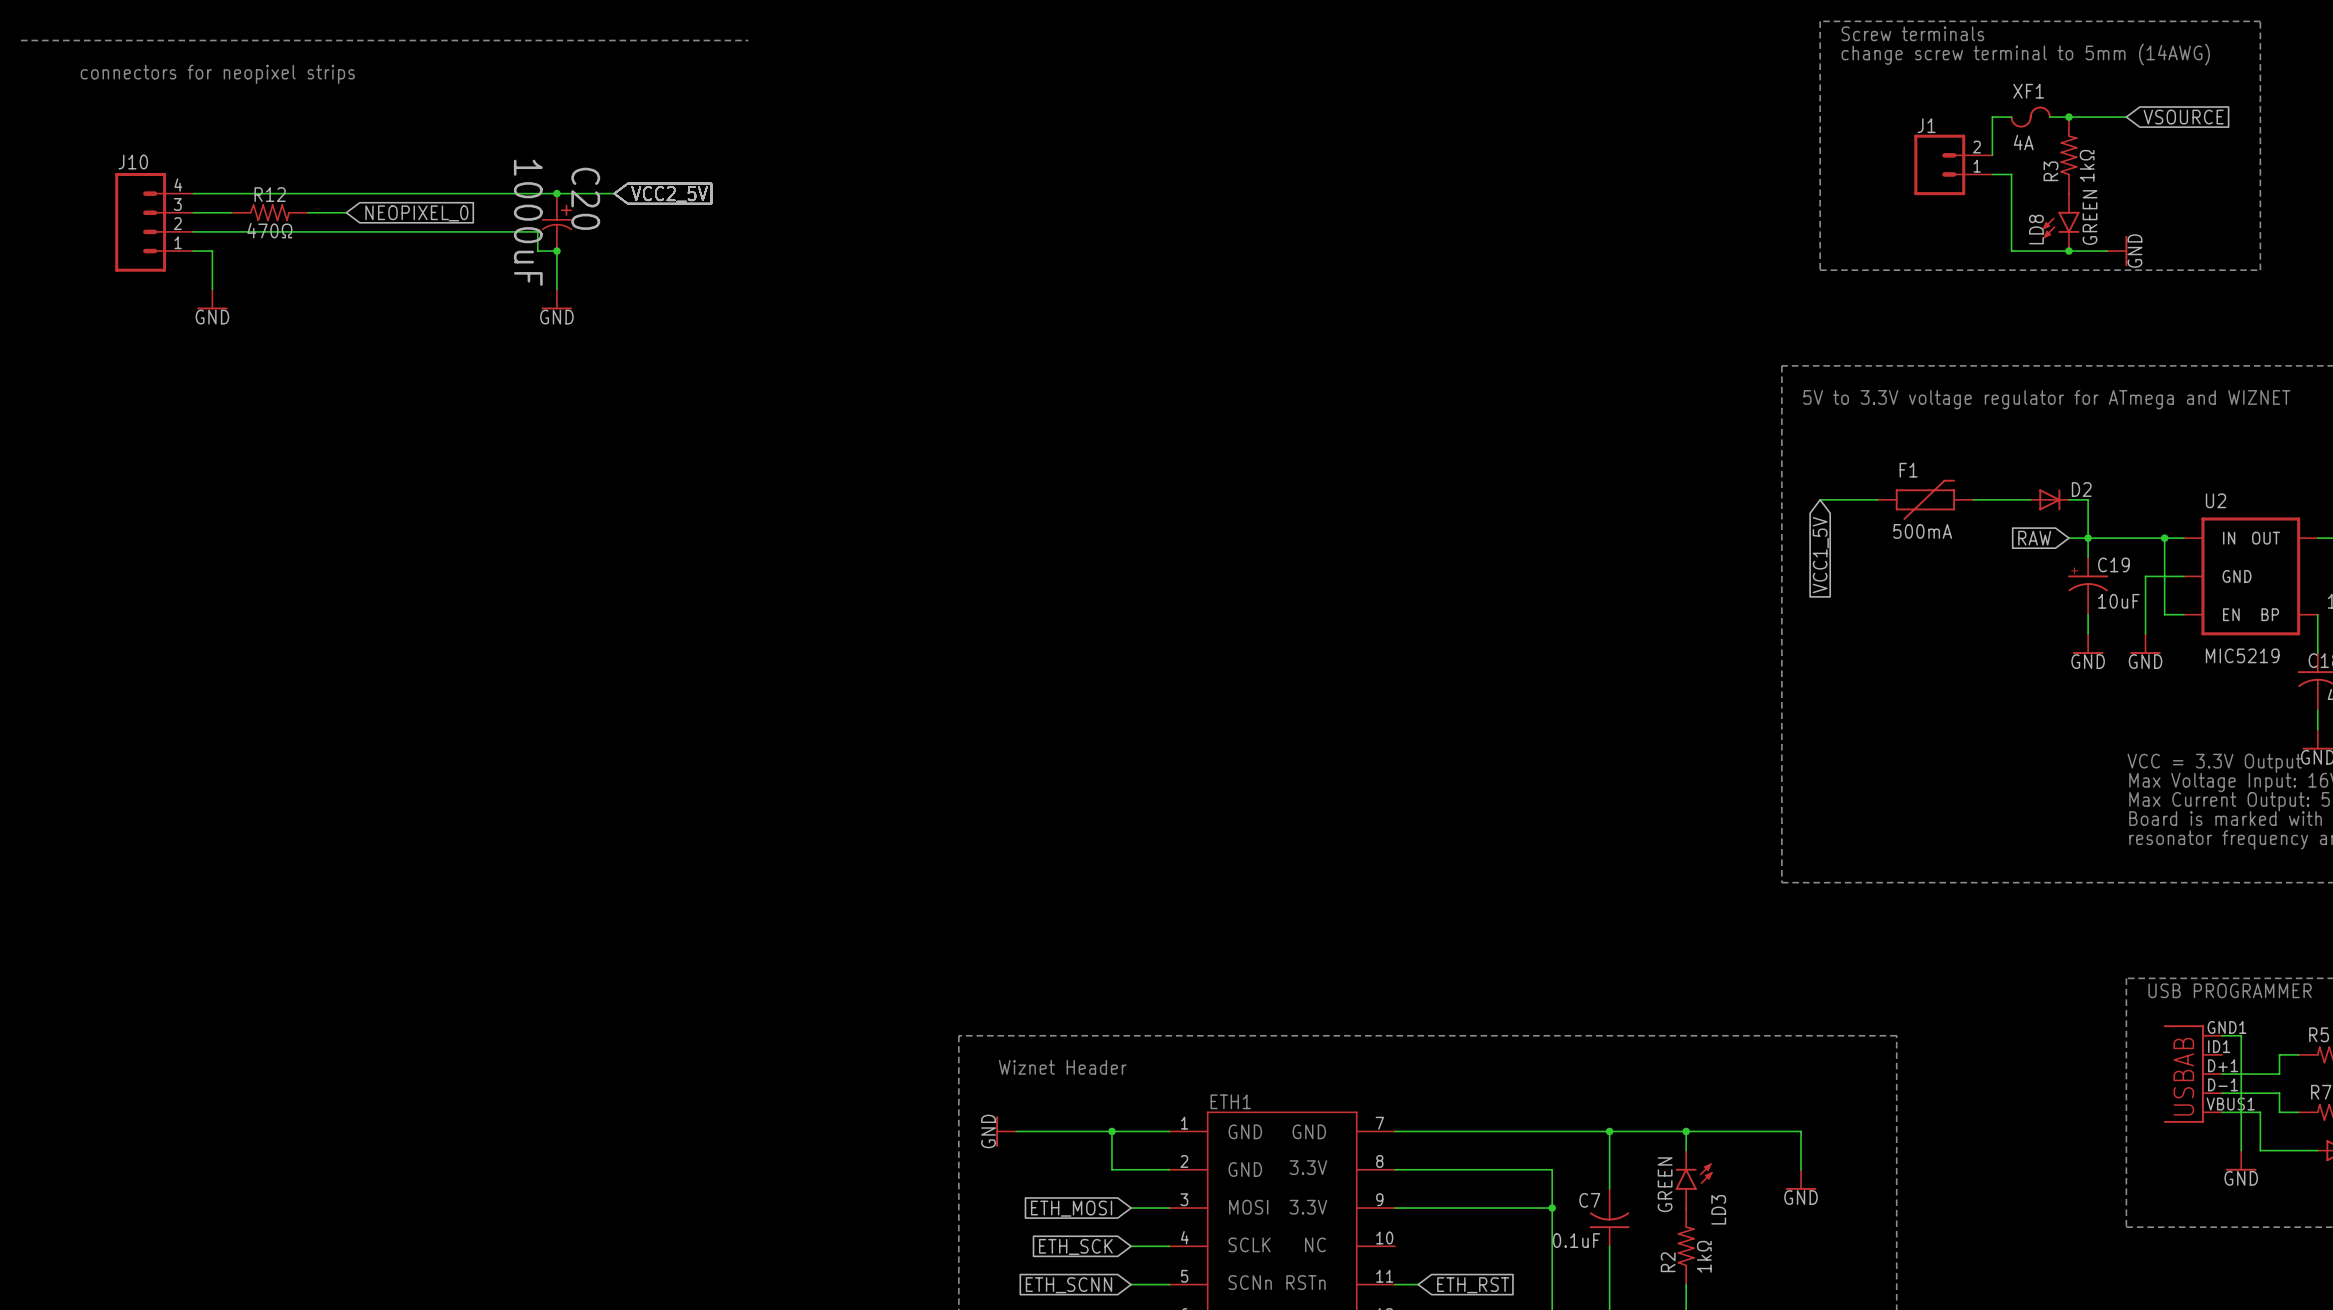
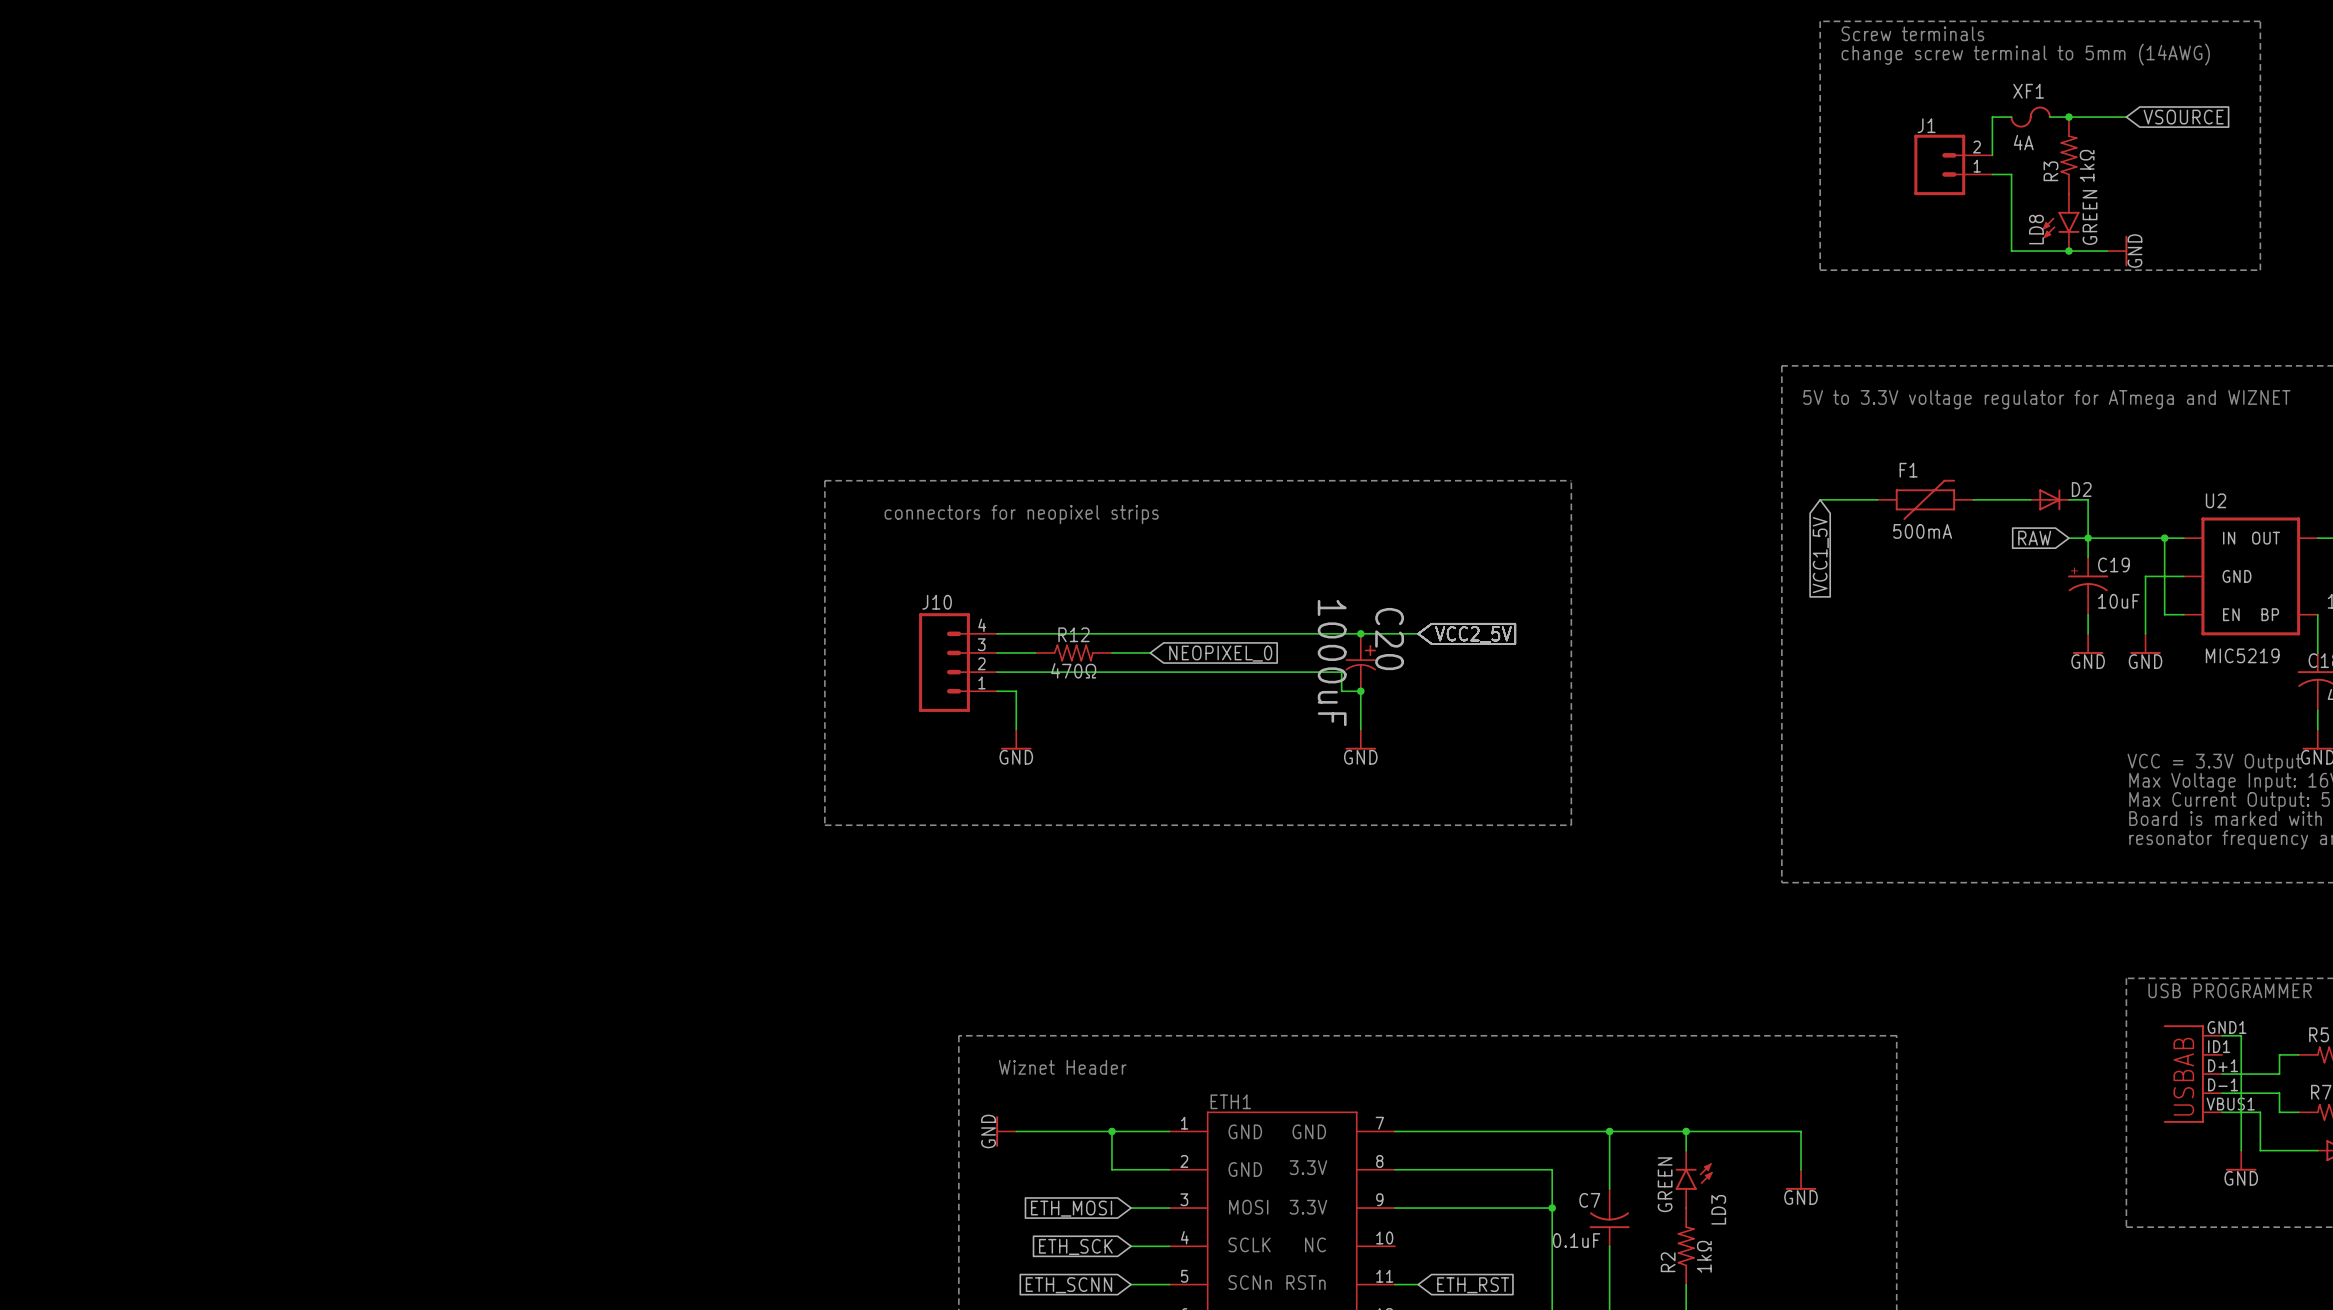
line: (21, 40) (748, 40) -> none
text: connectors for neopixel strips (217, 74) -> none
wire: (193, 193) (614, 193) -> none
junction: (556, 193) -> none
global label: VCC2_5V (669, 194) -> none
wire: (193, 212) (231, 212) -> none
R12 position: (269, 212) -> (1073, 652)
wire: (308, 212) (346, 212) -> none
global label: NEOPIXEL_0 (416, 213) -> none
J10 position: (154, 222) -> (958, 662)
C20 position: (556, 222) -> (1360, 662)
wire: (193, 231) (537, 231) (537, 251) (556, 251) (556, 289) -> none
wire: (193, 251) (212, 251) (212, 289) -> none
junction: (556, 251) -> none
power symbol: GND (212, 299) -> none
power symbol: GND (556, 299) -> none
line: none -> (824, 480) (1571, 480) (1571, 825) (824, 825) (824, 480)
text: none -> connectors for neopixel strips (1021, 514)
wire: none -> (997, 633) (1418, 633)
junction: none -> (1360, 633)
global label: none -> VCC2_5V (1473, 634)
wire: none -> (997, 652) (1035, 652)
wire: none -> (1111, 652) (1150, 652)
global label: none -> NEOPIXEL_0 (1220, 653)
wire: none -> (997, 672) (1341, 672) (1341, 691) (1360, 691) (1360, 729)
wire: none -> (997, 691) (1016, 691) (1016, 729)
junction: none -> (1360, 691)
power symbol: none -> GND (1016, 739)
power symbol: none -> GND (1360, 739)

